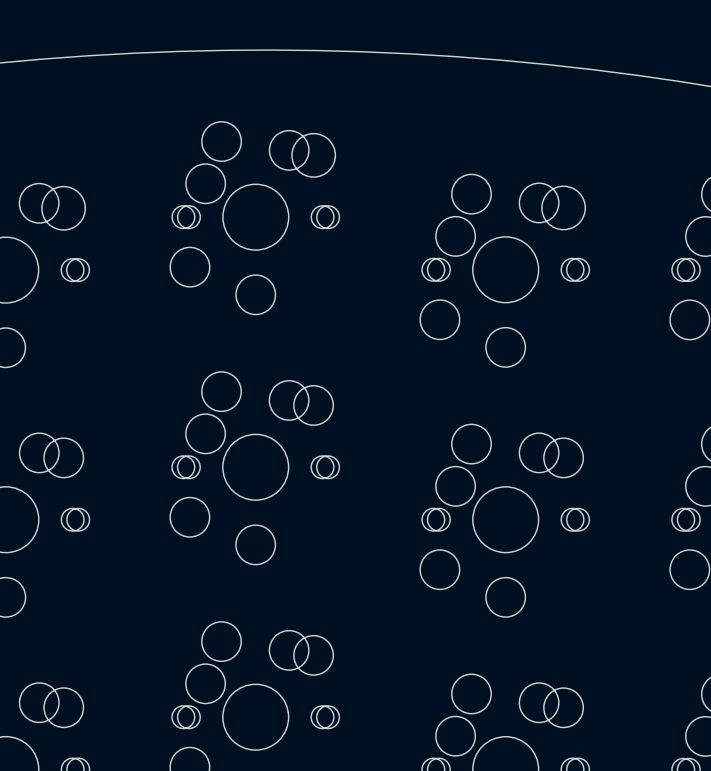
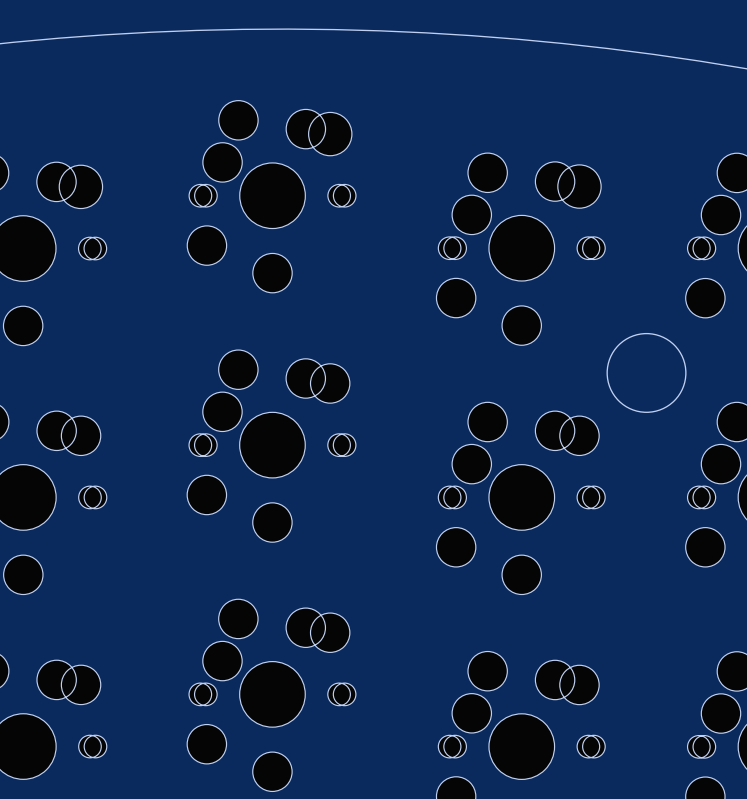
round board edge: none -> [606, 332, 687, 413]

